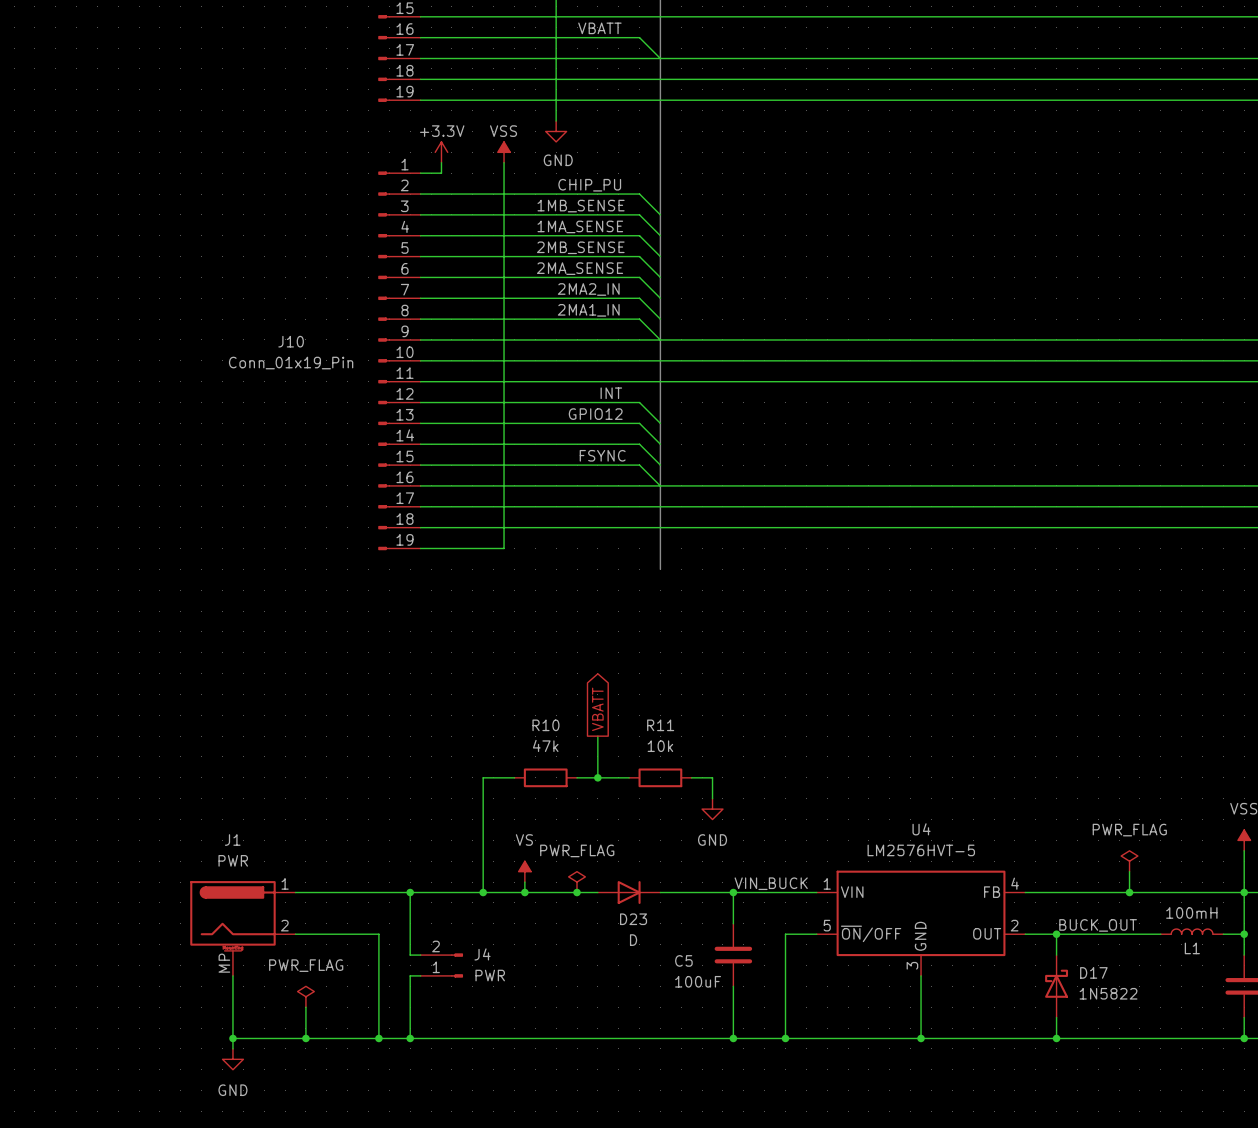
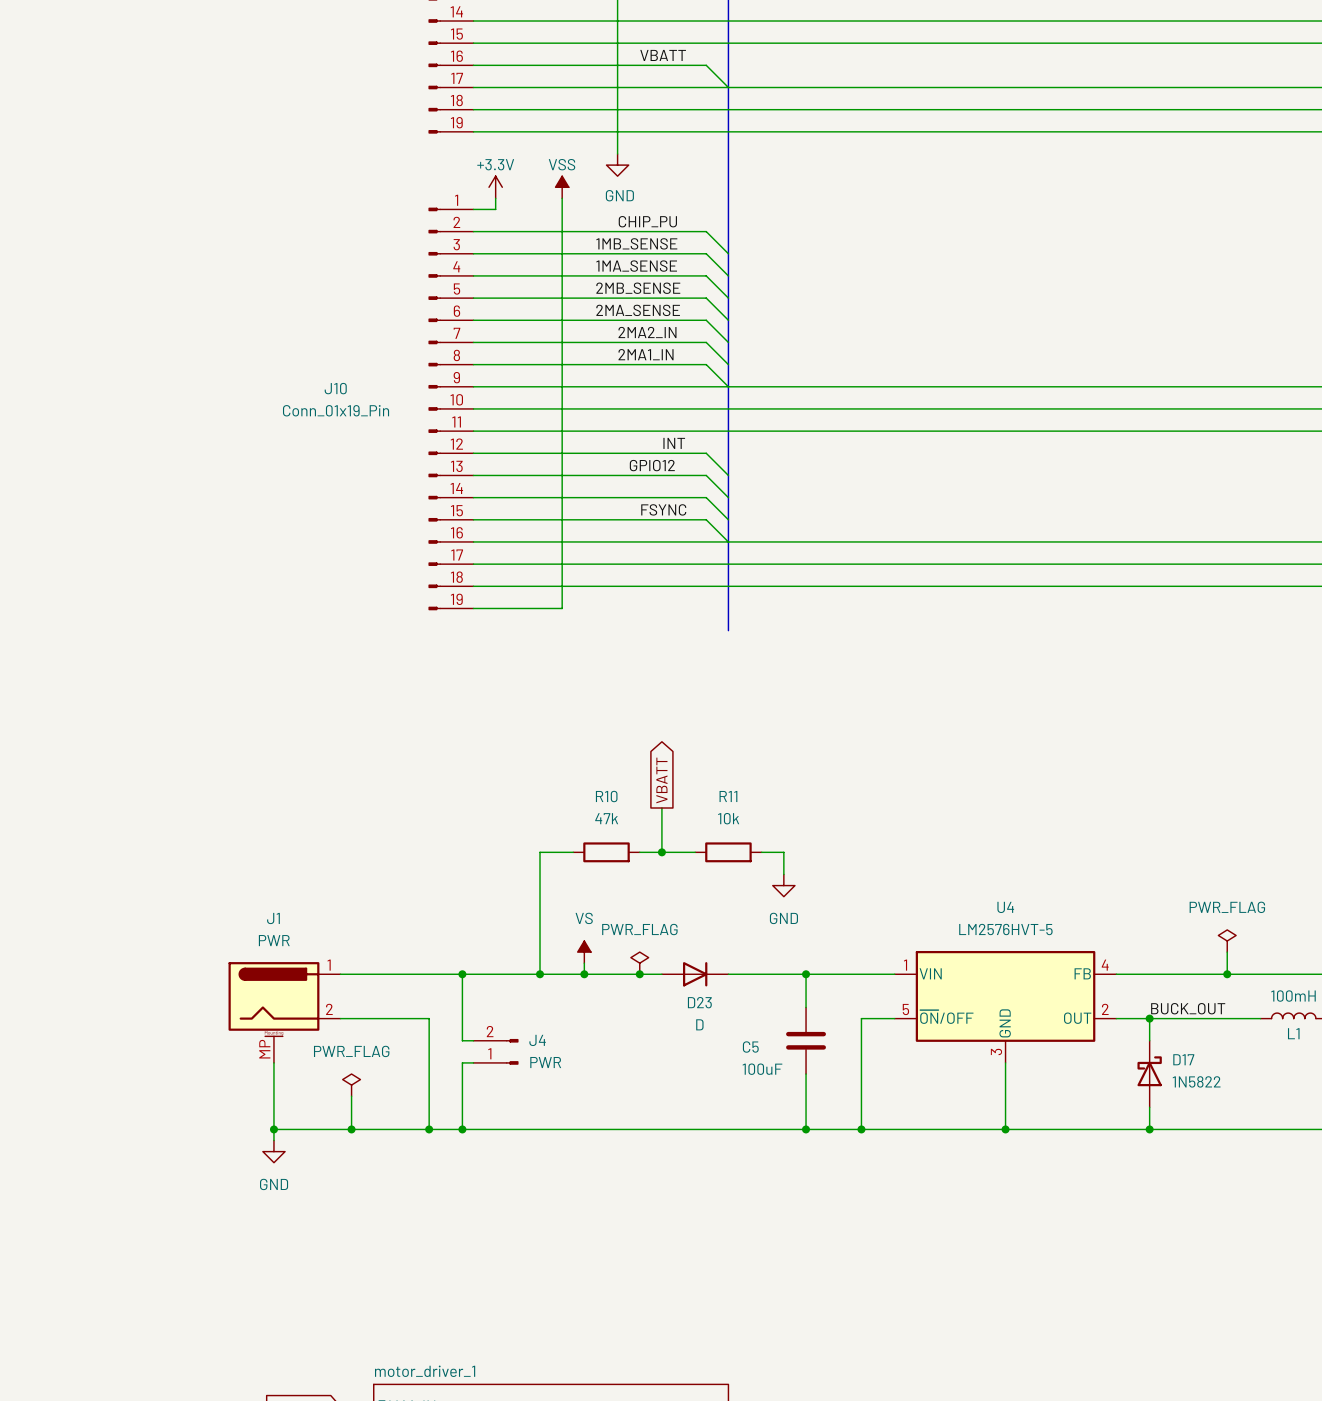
label: VIN_BUCK (771, 883) -> none

